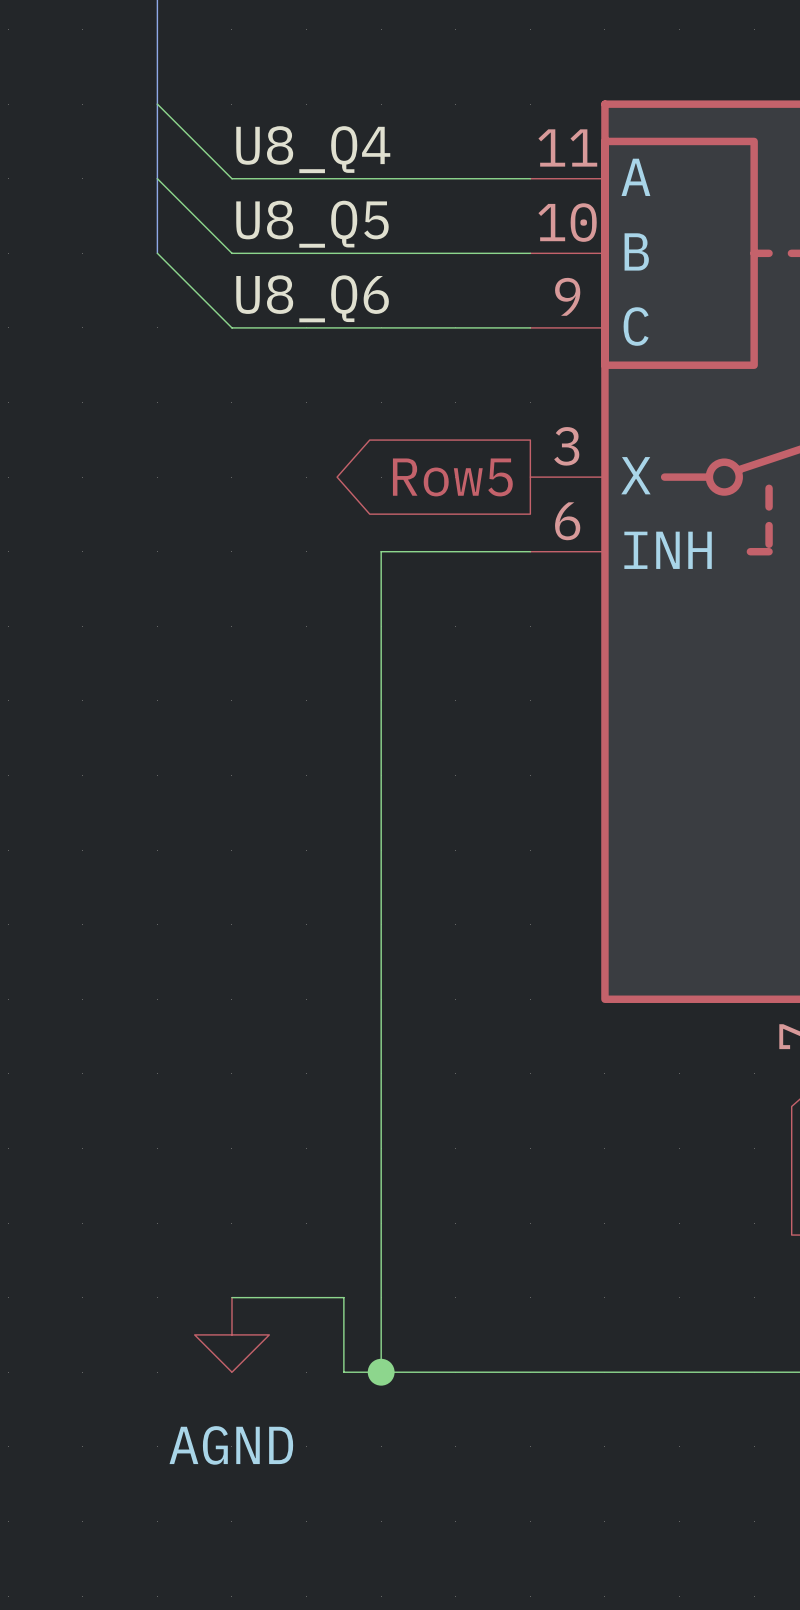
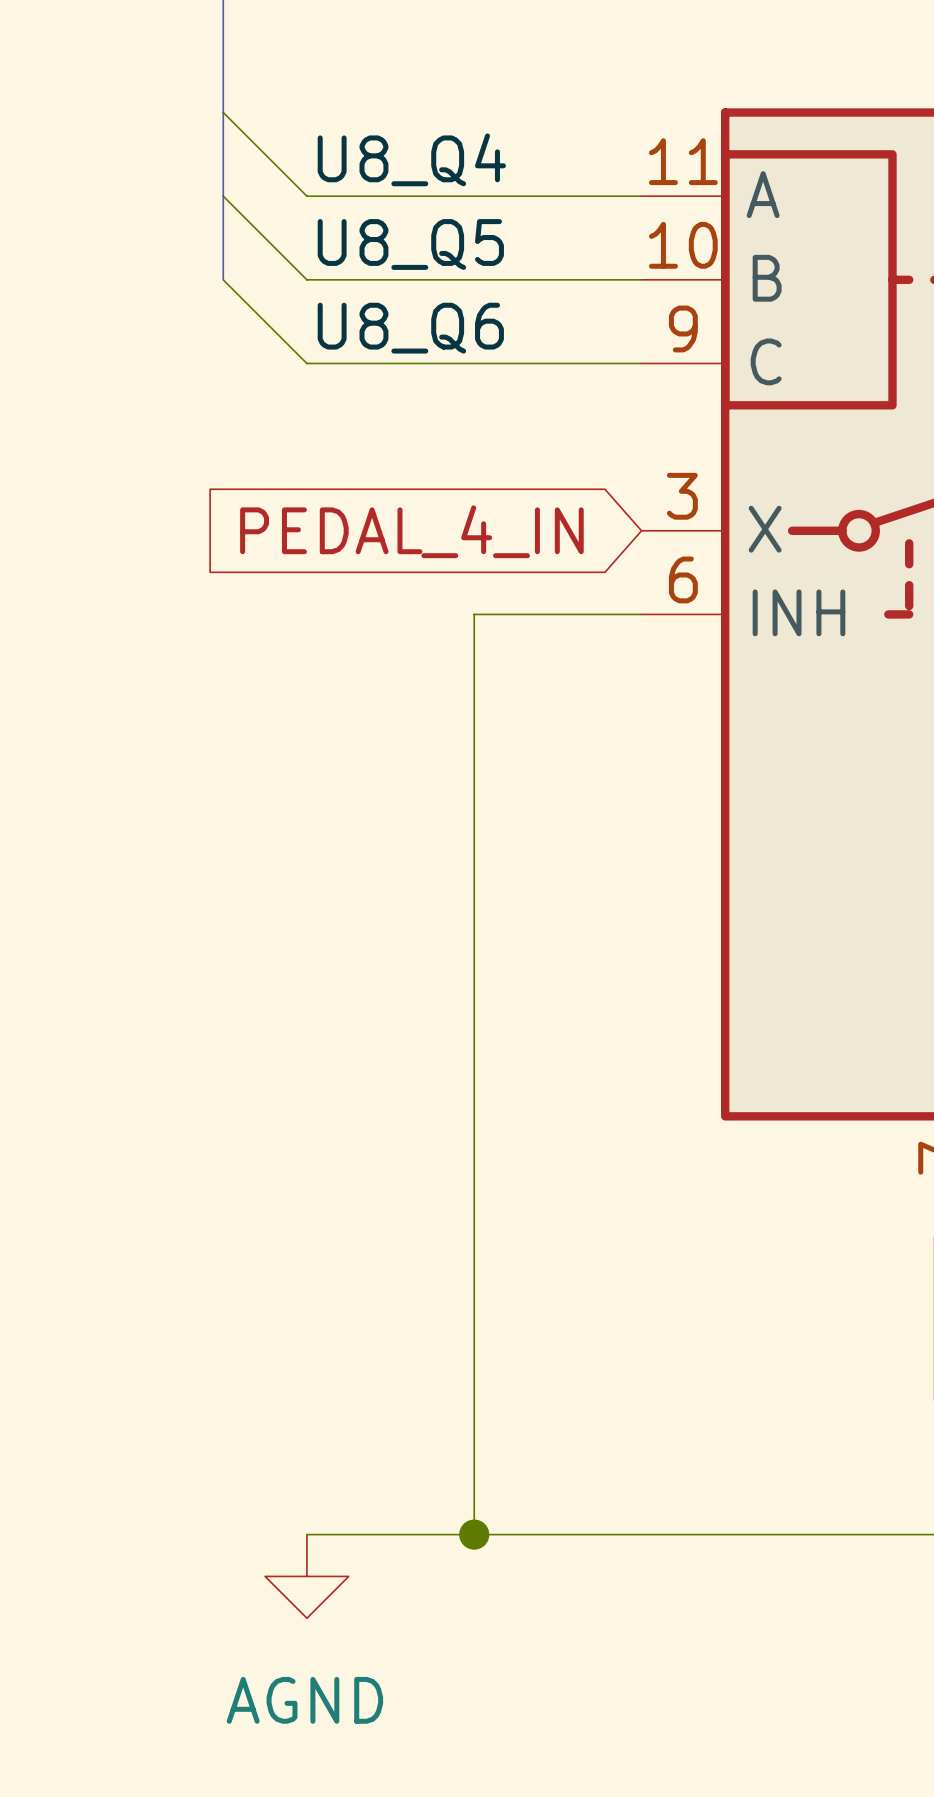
global label shape: output (452, 477) -> input (411, 531)
global label: Row5 (452, 477) -> PEDAL_4_IN (411, 531)
wire: (231, 1297) (343, 1297) (343, 1372) -> (306, 1534) (432, 1534)
power symbol position: AGND (231, 1334) -> AGND (306, 1576)

